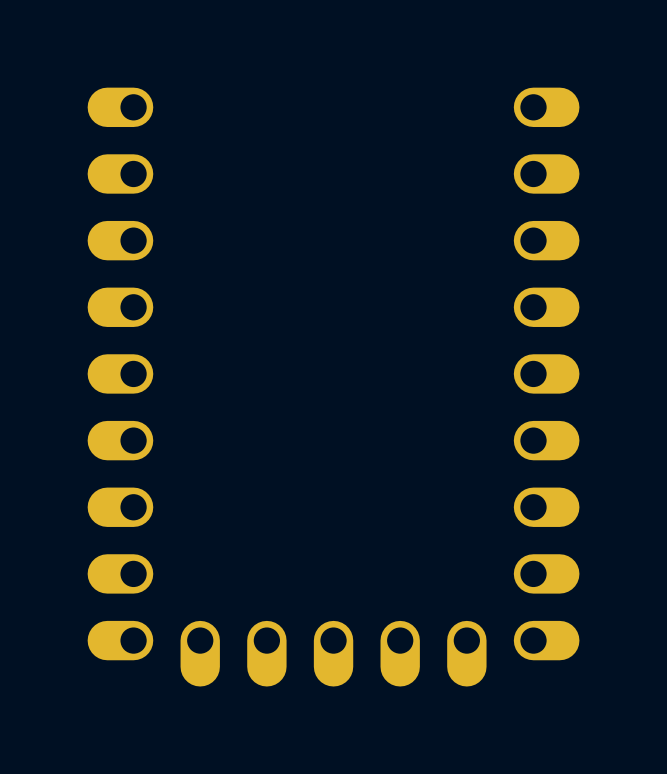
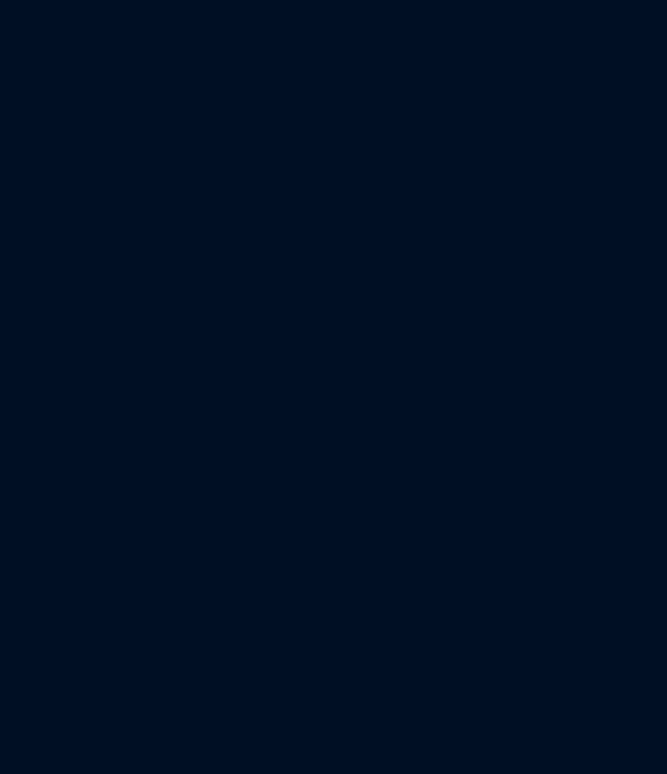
part: (333, 387) -> none

